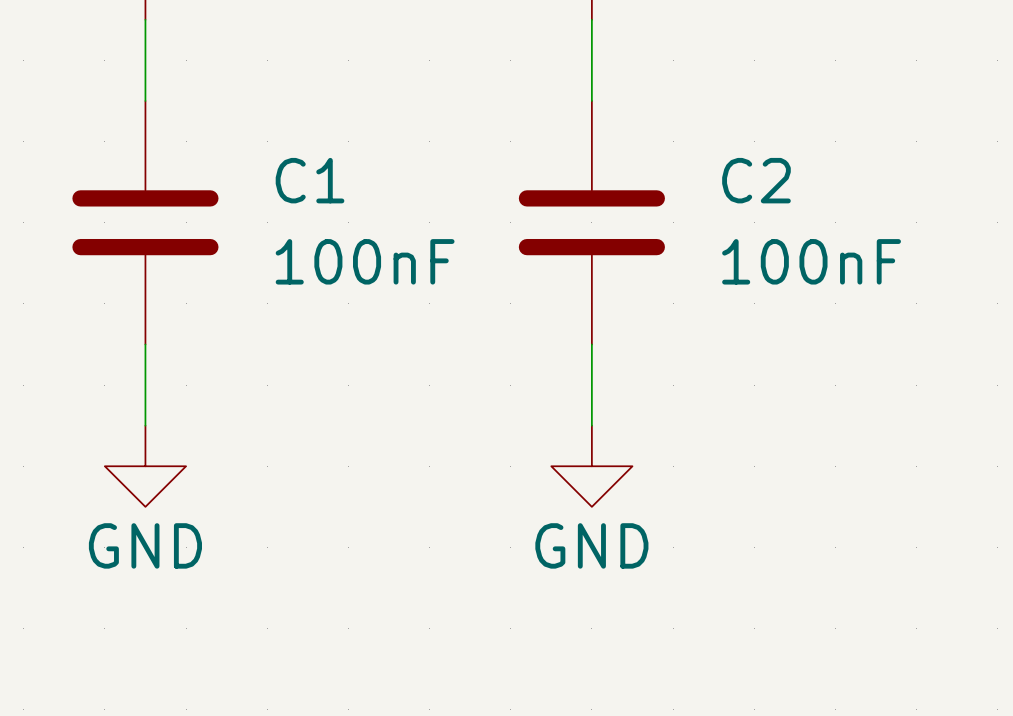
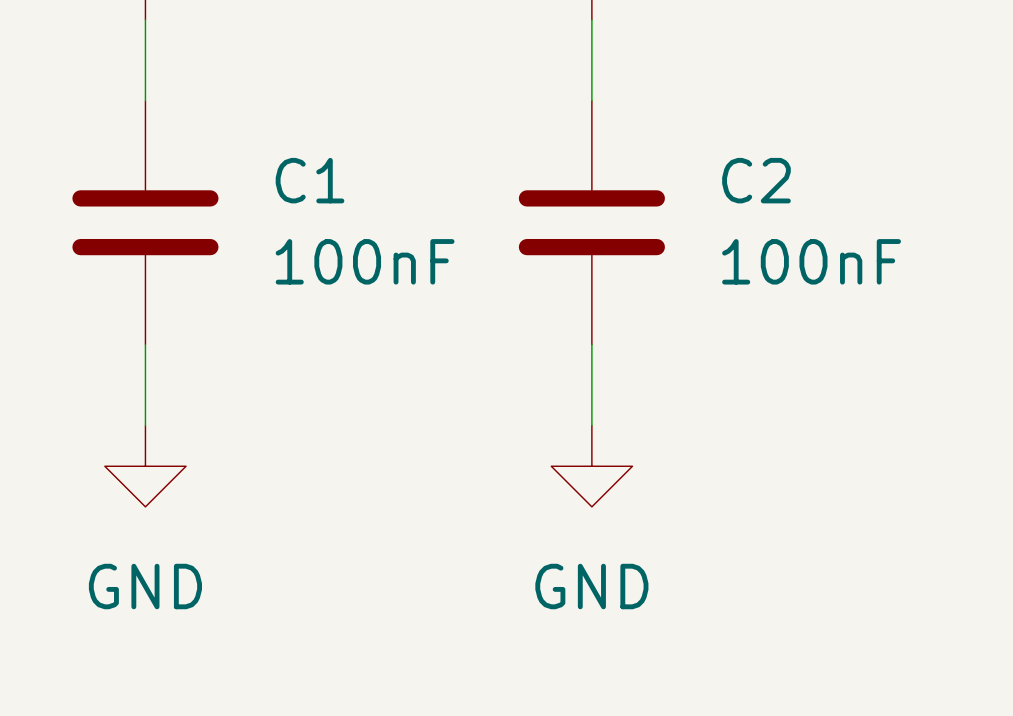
power symbol text position: GND (145, 545) -> GND (145, 586)
power symbol text position: GND (591, 545) -> GND (591, 586)

